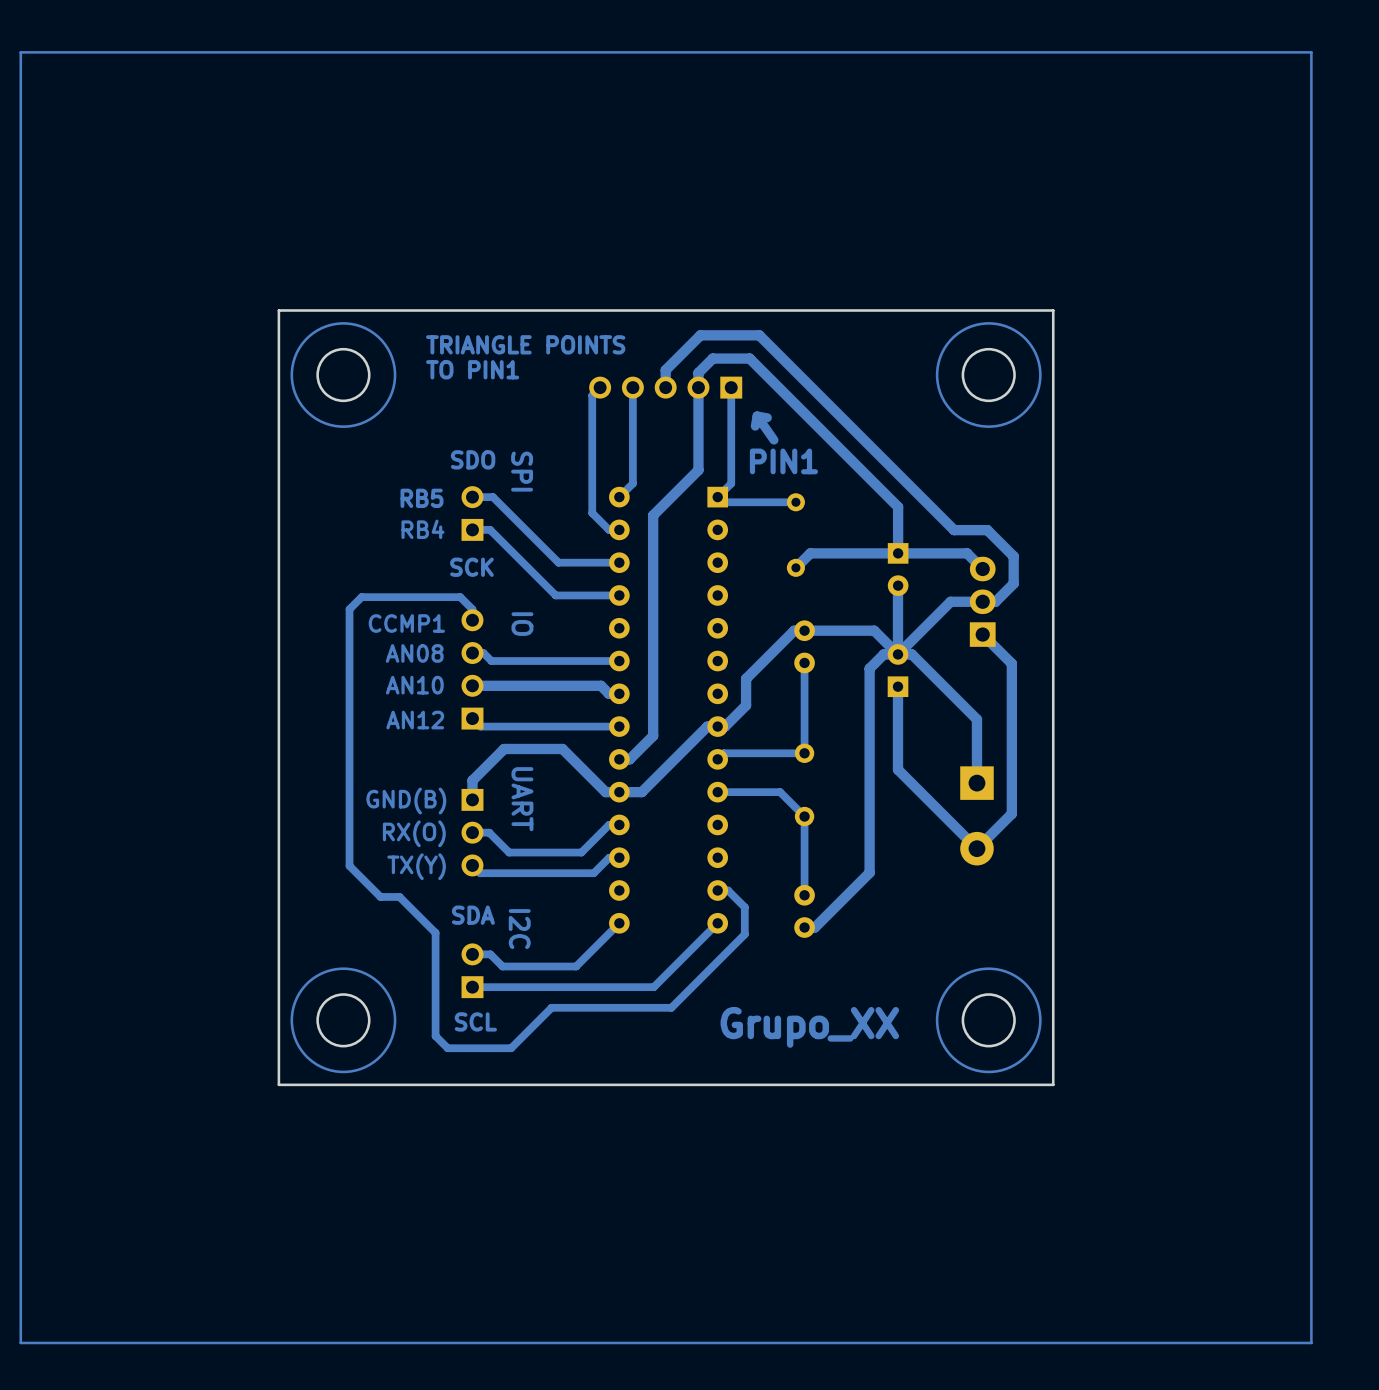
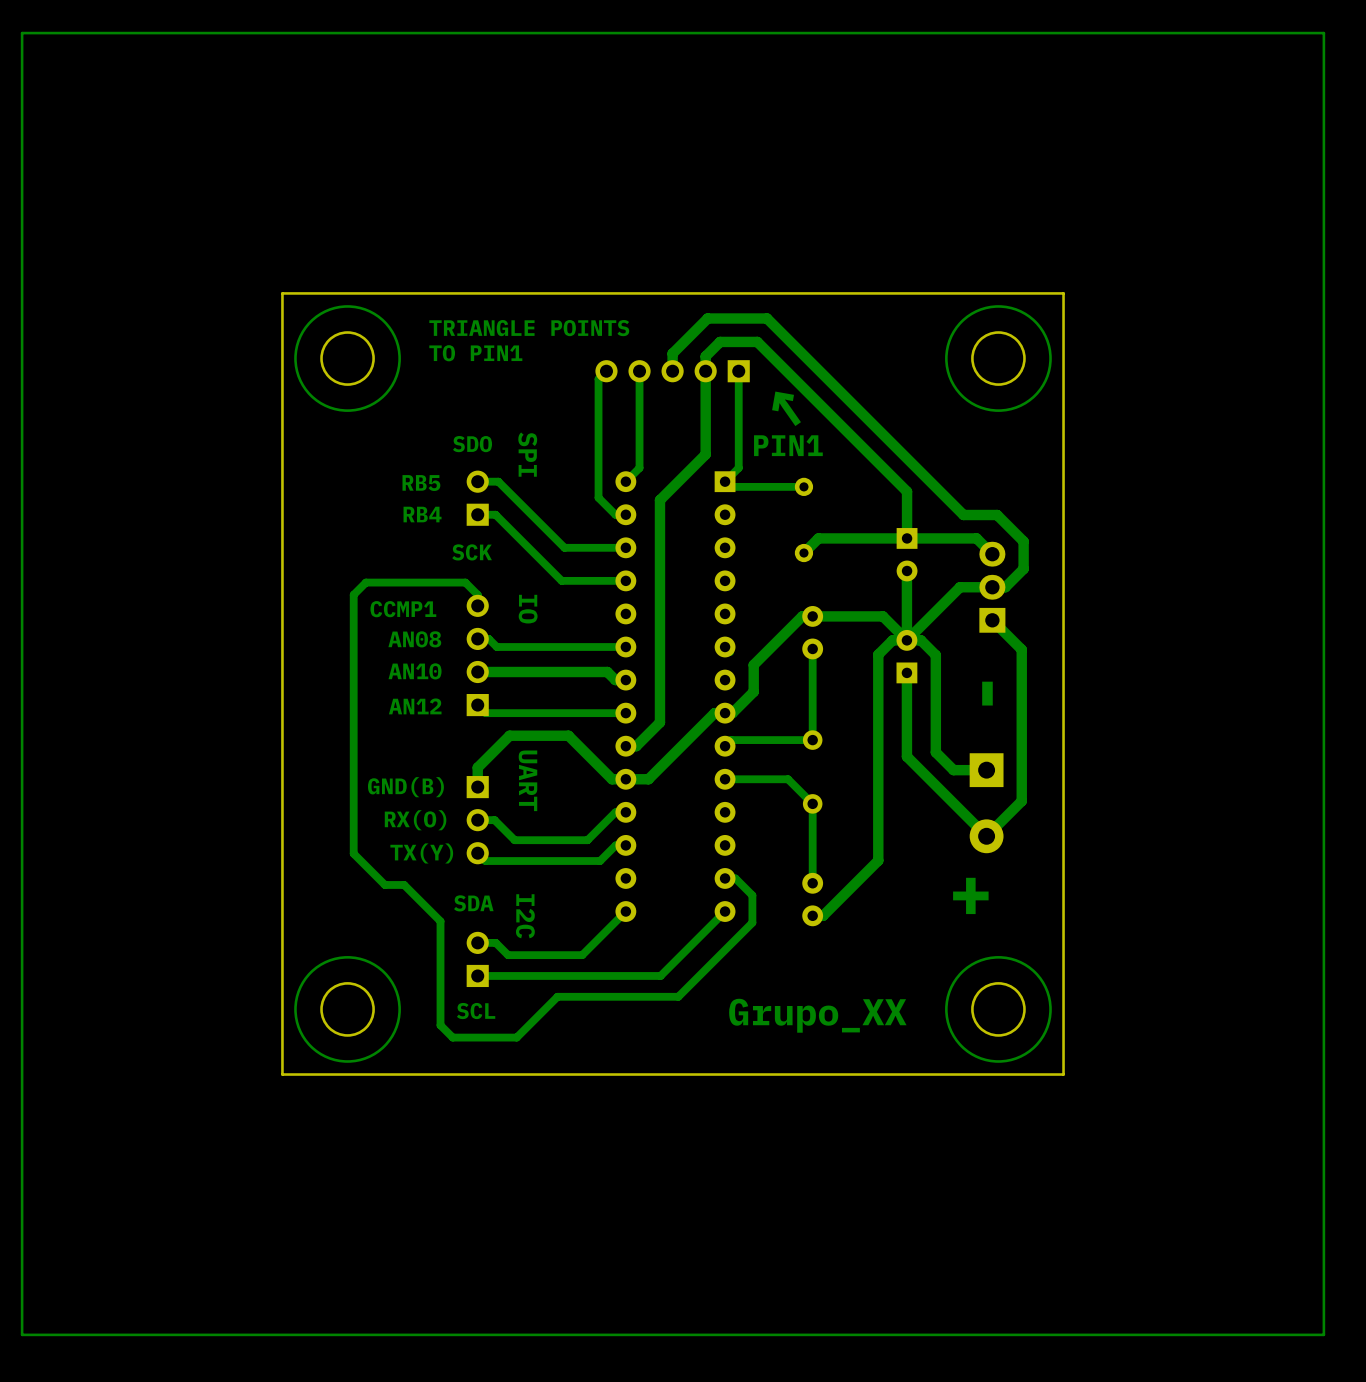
bottom track: (926, 669) (976, 719) (976, 783) -> (935, 655) (935, 752) (953, 770) (986, 770)
text: none -> - (987, 693)
text: none -> + (970, 895)

